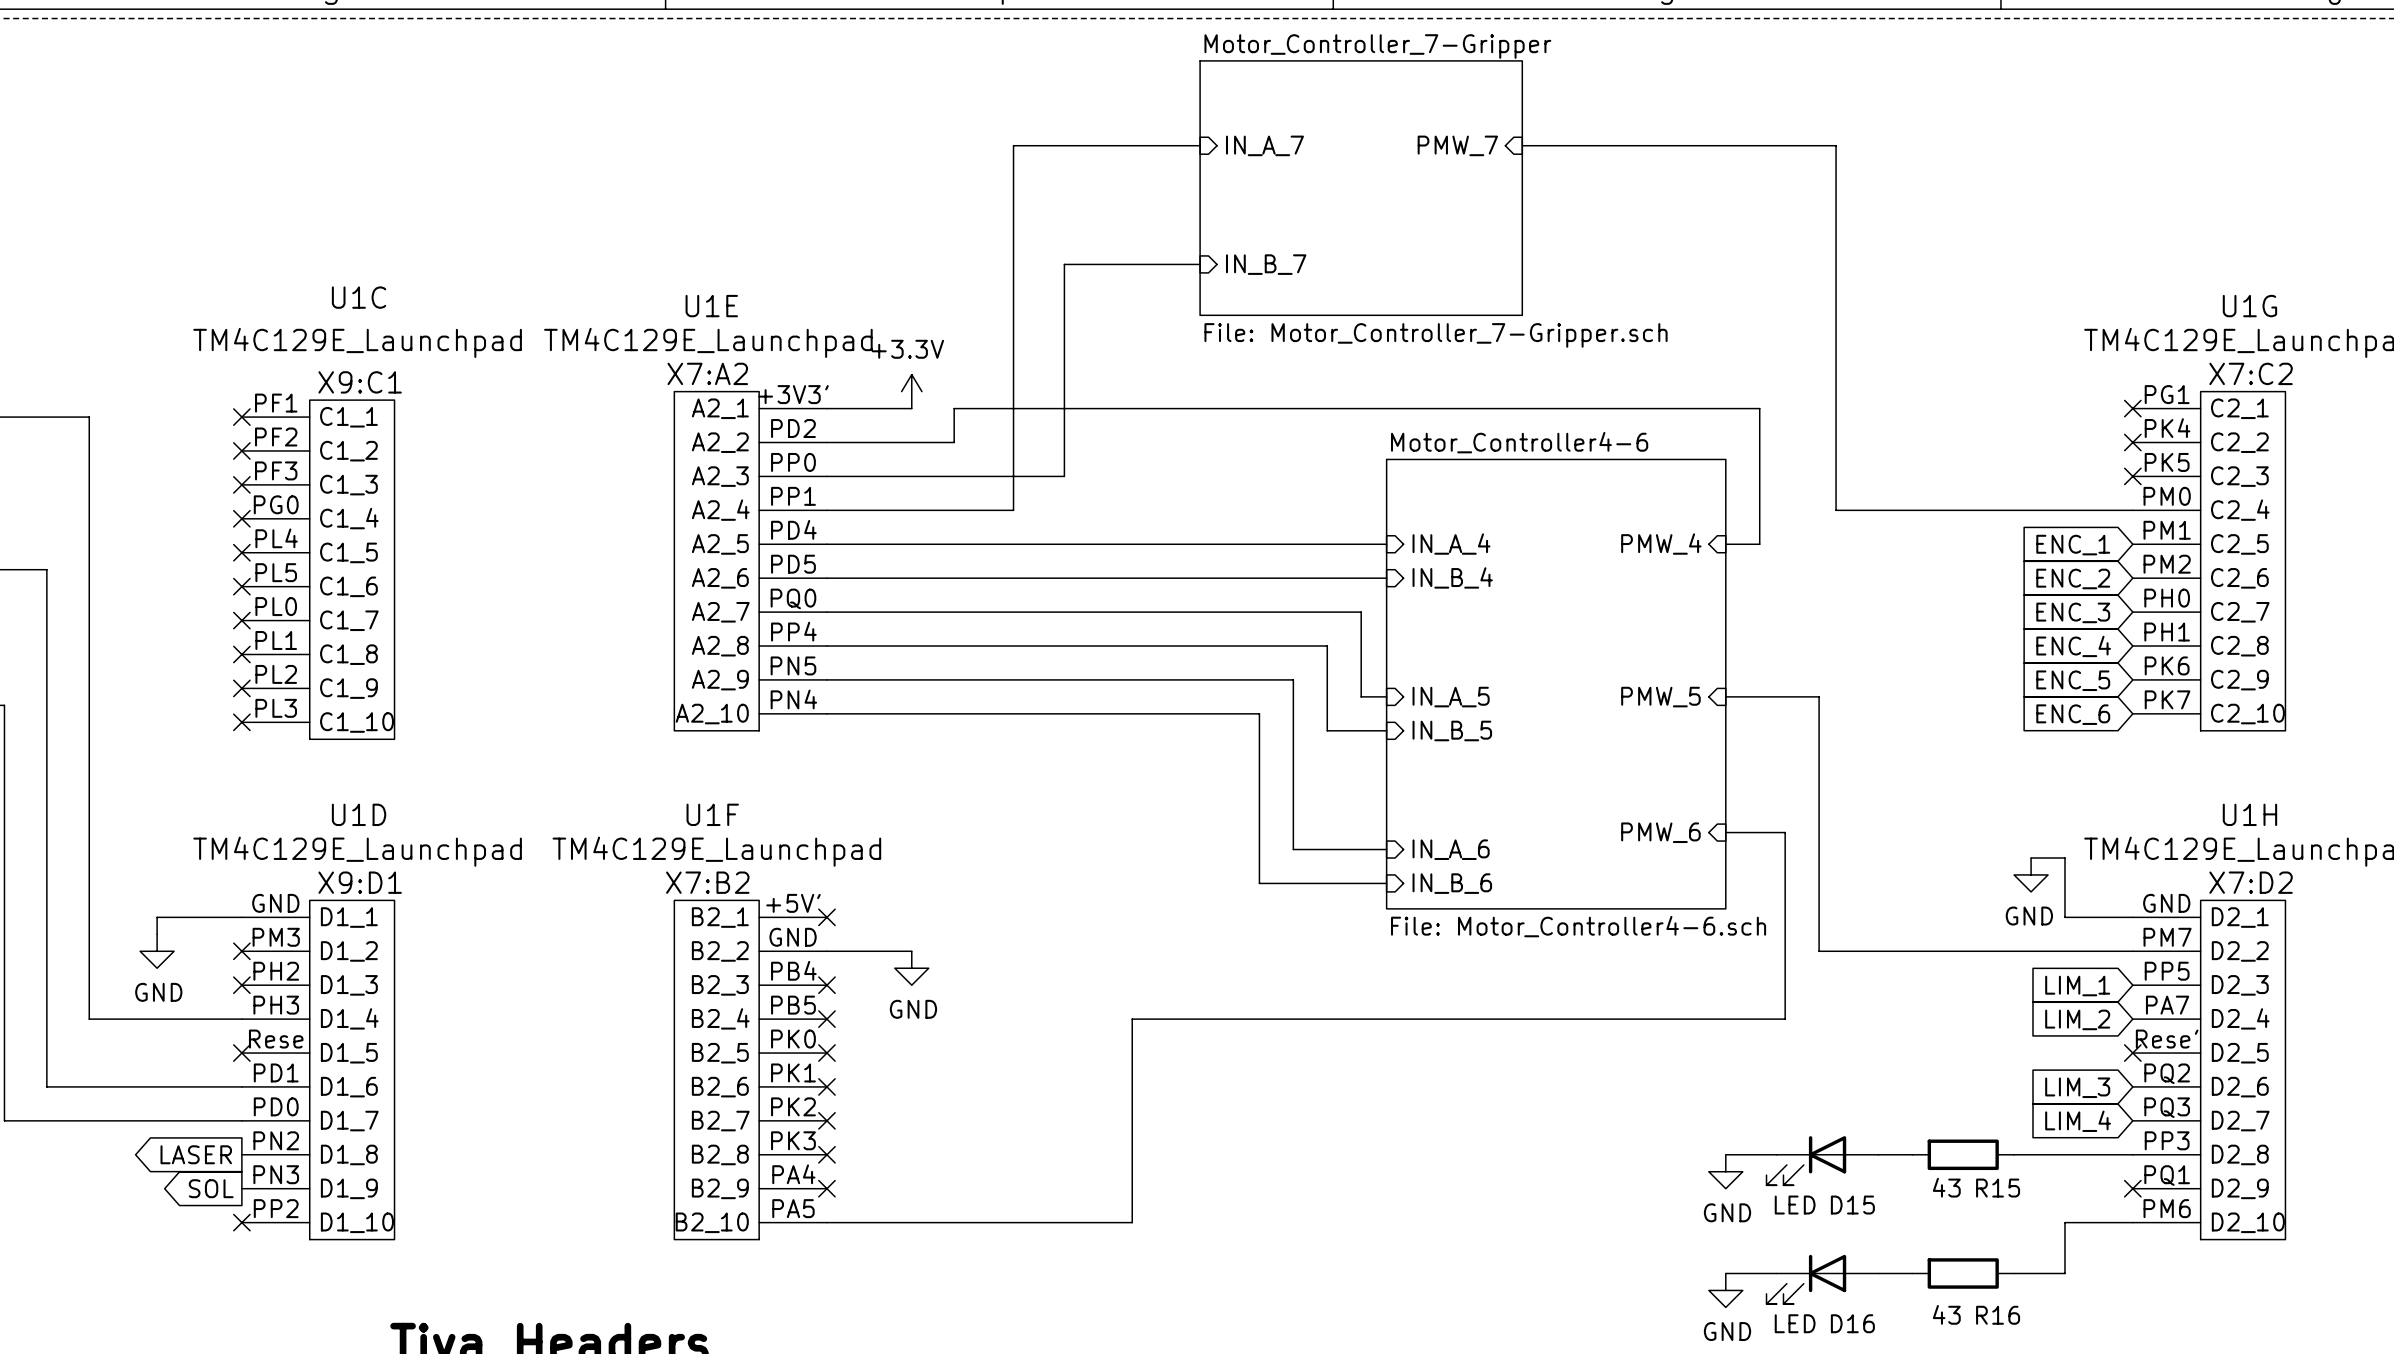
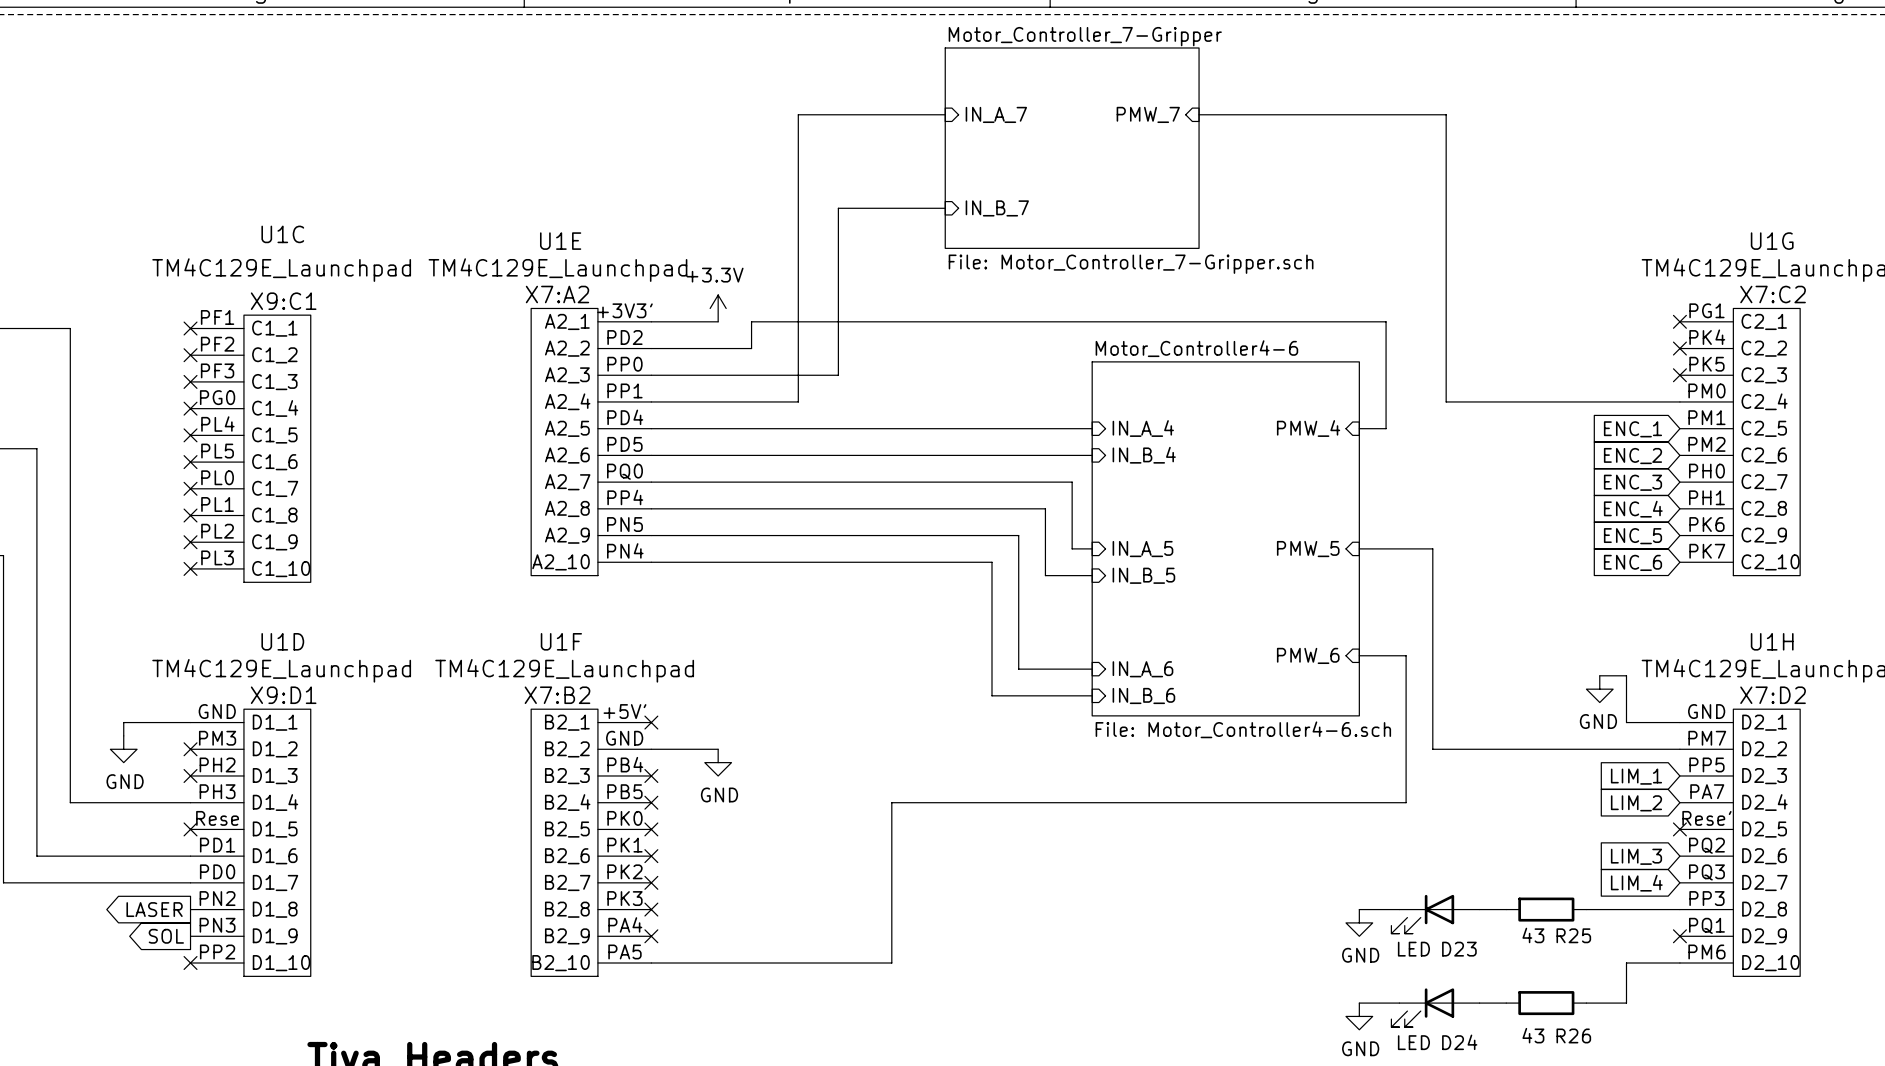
R15 name: R15 (1998, 1188) -> R25 (1573, 935)
D15 name: D15 (1852, 1205) -> D23 (1459, 949)
R16 name: R16 (1998, 1315) -> R26 (1573, 1035)
D16 name: D16 (1852, 1323) -> D24 (1459, 1042)

